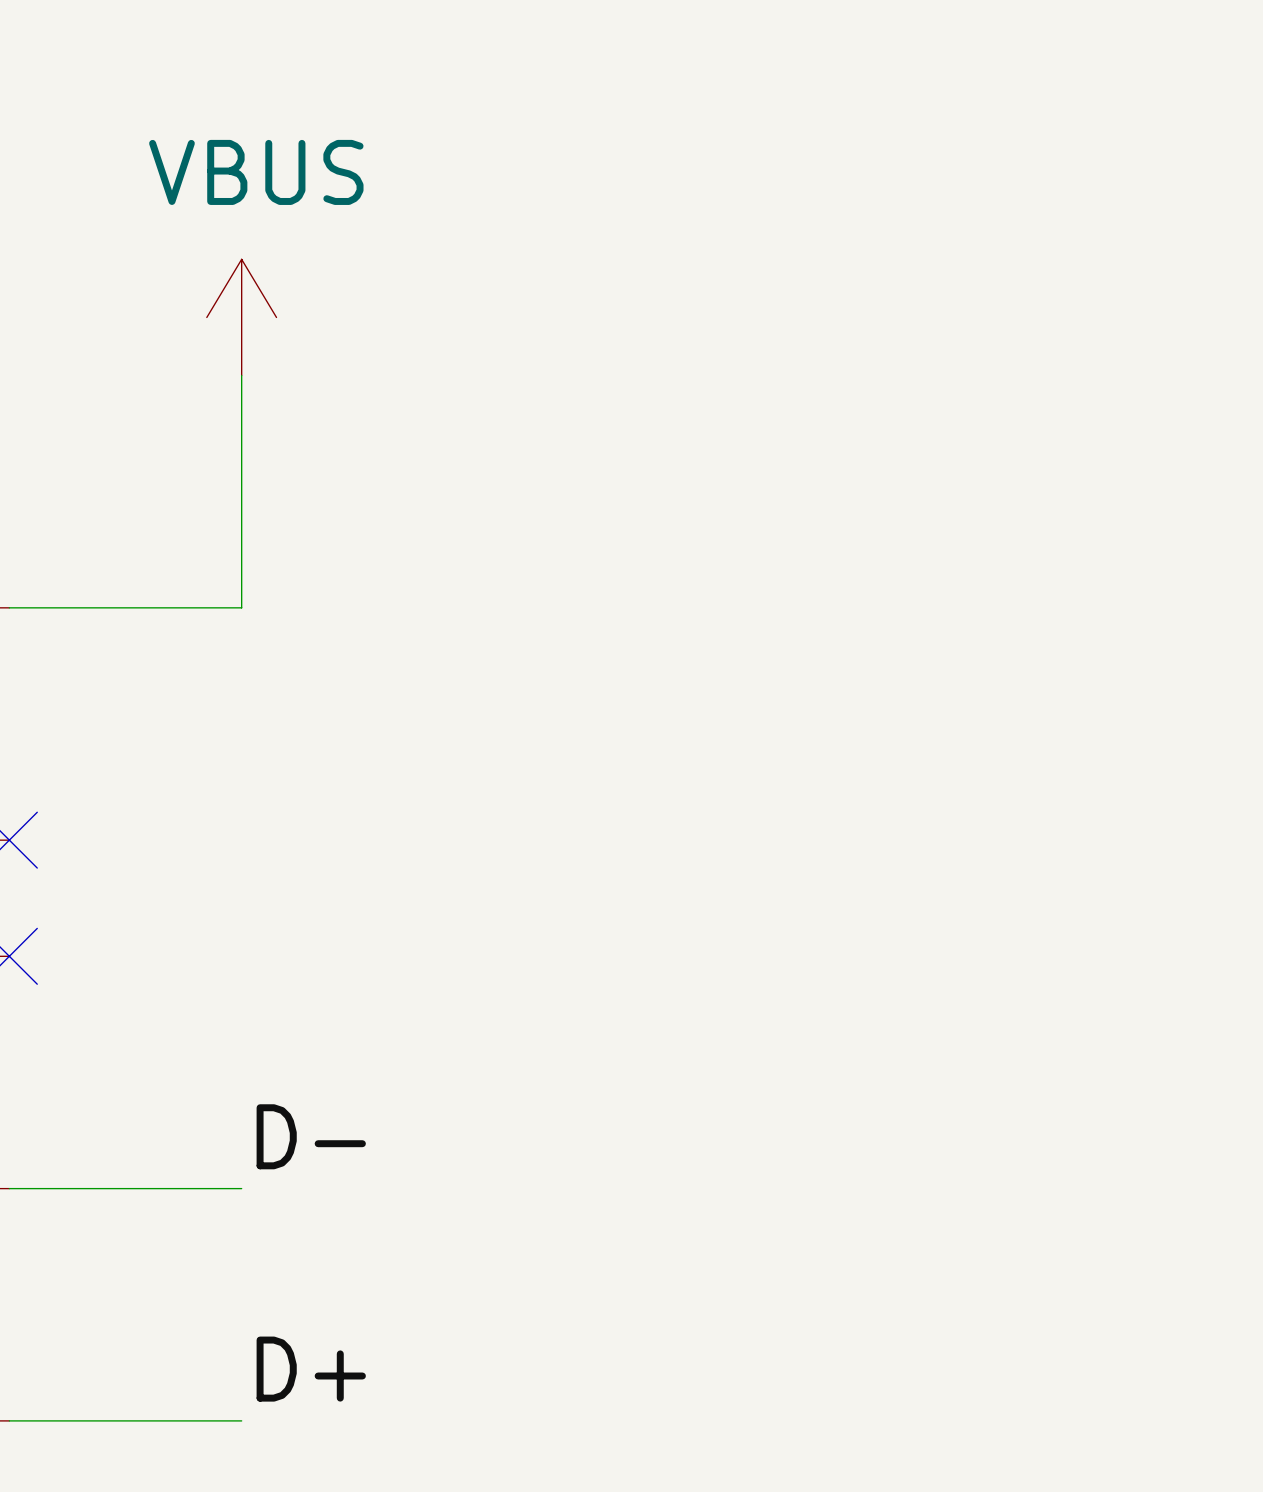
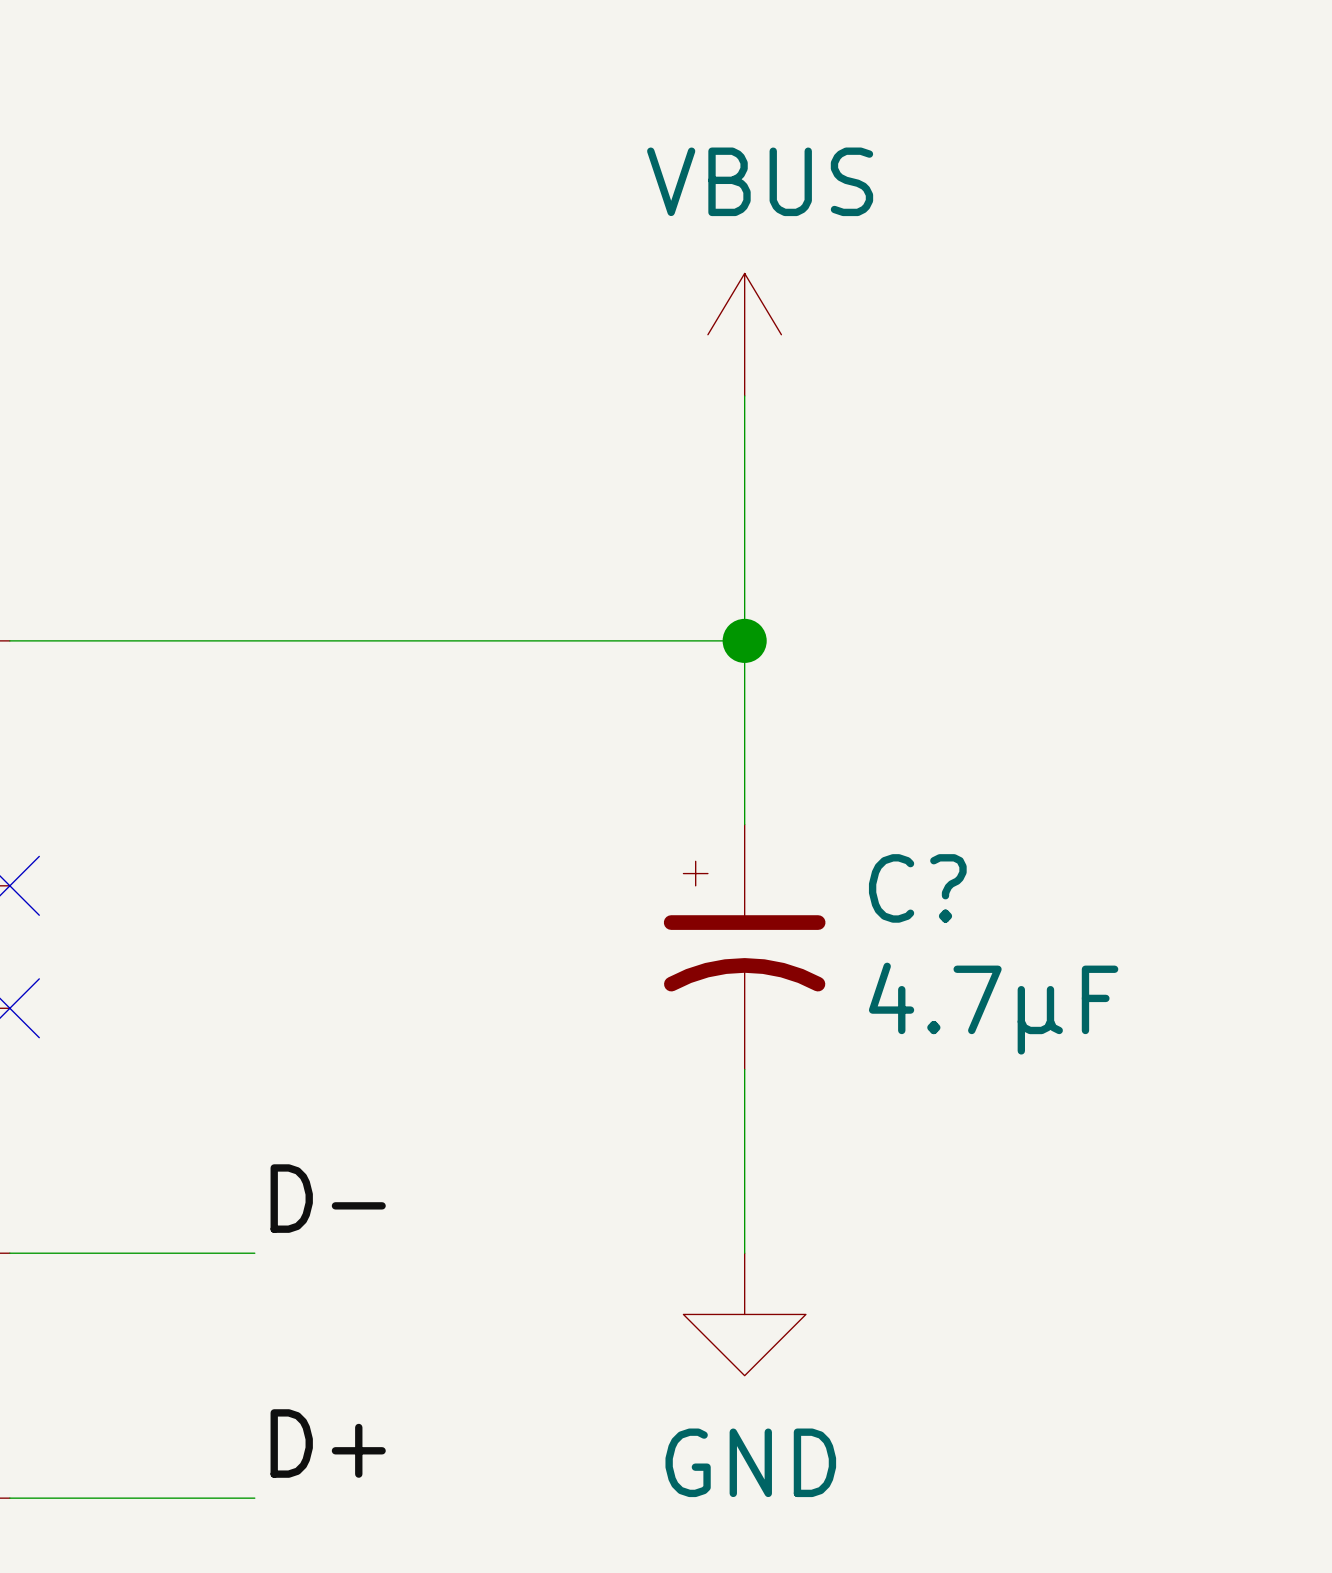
power symbol position: VBUS (241, 317) -> VBUS (744, 334)
wire: (241, 375) (241, 607) -> (744, 640) (254, 640)
wire: none -> (744, 395) (744, 824)
junction: none -> (744, 640)
C?: none -> 4.7μF (744, 947)
wire: none -> (744, 1069) (744, 1253)
power symbol: none -> GND (744, 1314)

